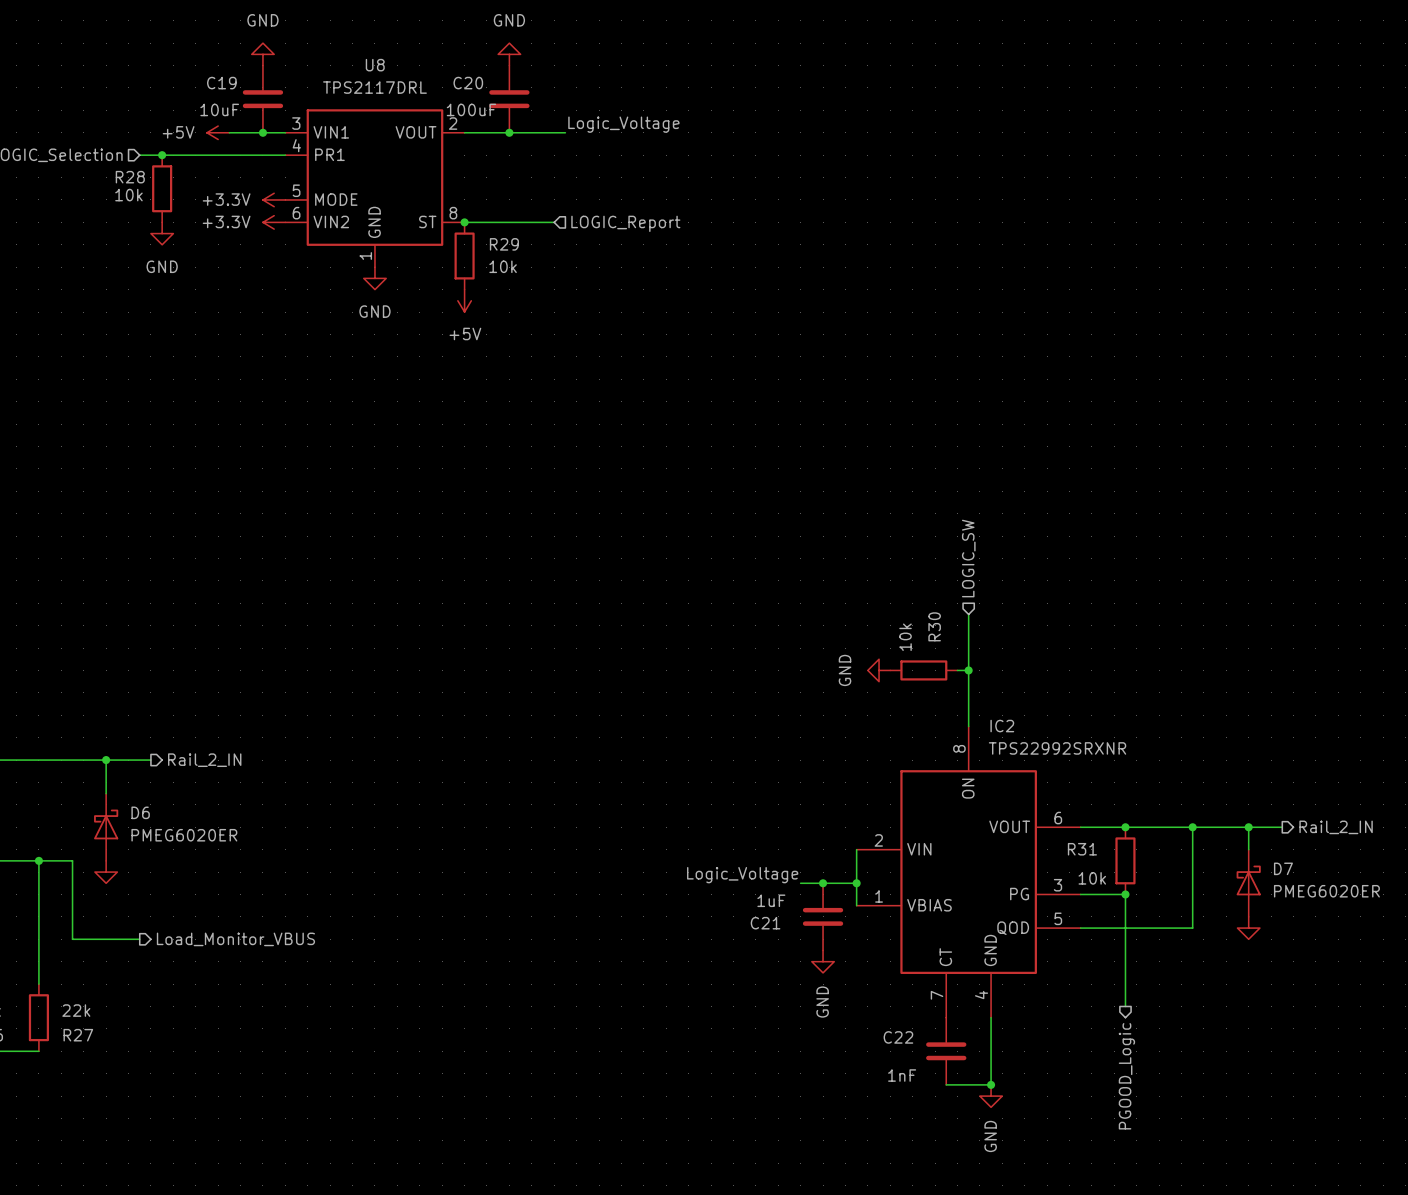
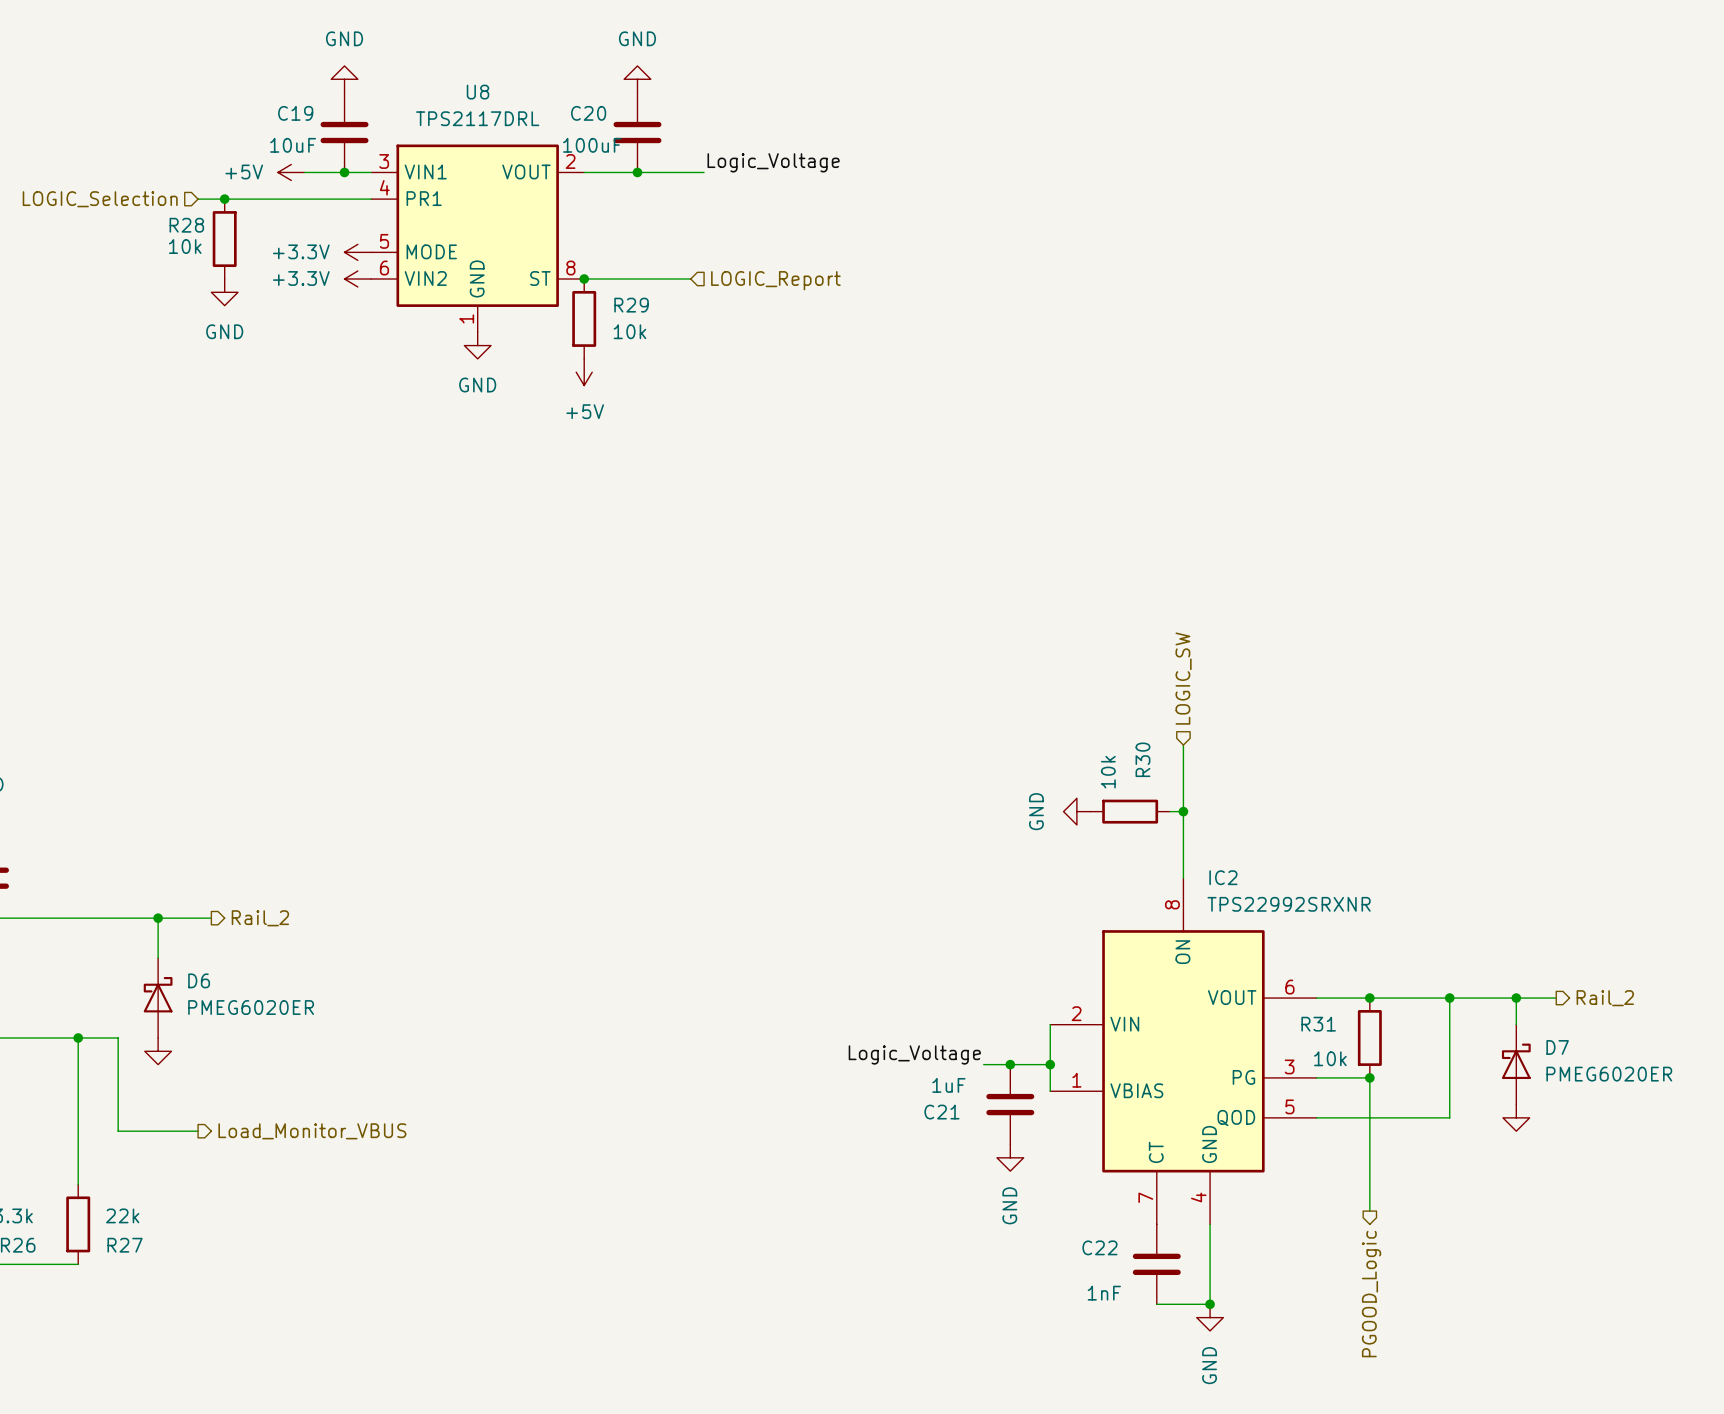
hierarchical label: Rail_2_IN (204, 760) -> Rail_2 (260, 918)
hierarchical label: Rail_2_IN (1336, 827) -> Rail_2 (1605, 998)

